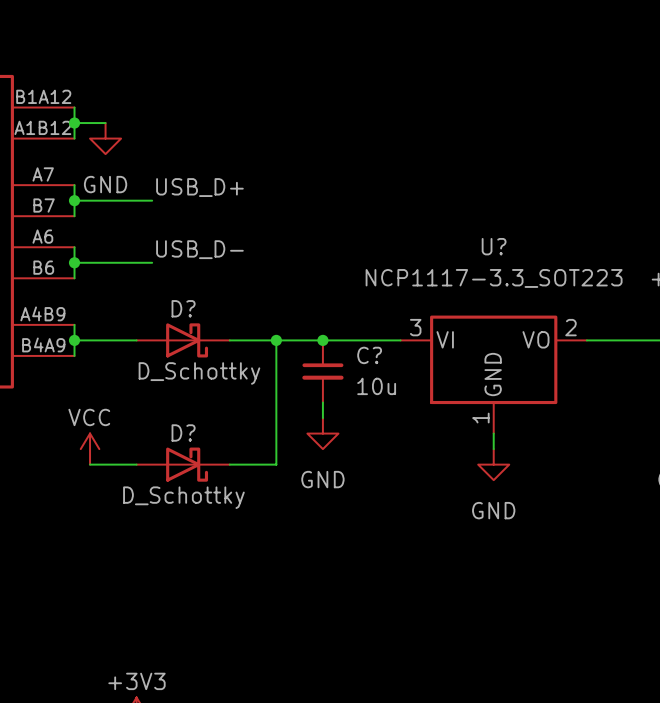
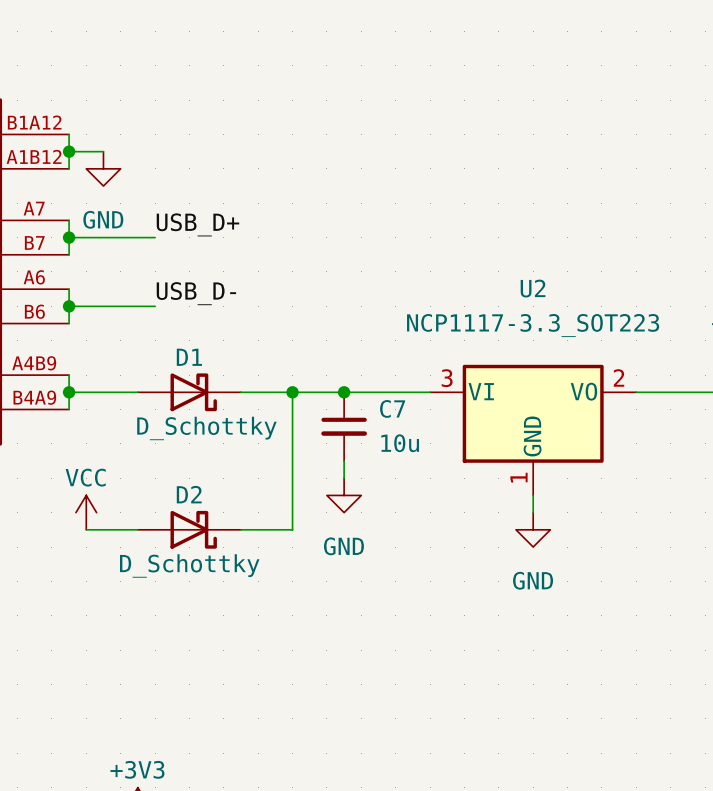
U? name: U? (494, 246) -> U2 (533, 288)
D? name: D? (183, 308) -> D1 (189, 357)
C? name: C? (369, 355) -> C7 (392, 408)
D? name: D? (183, 432) -> D2 (189, 494)

